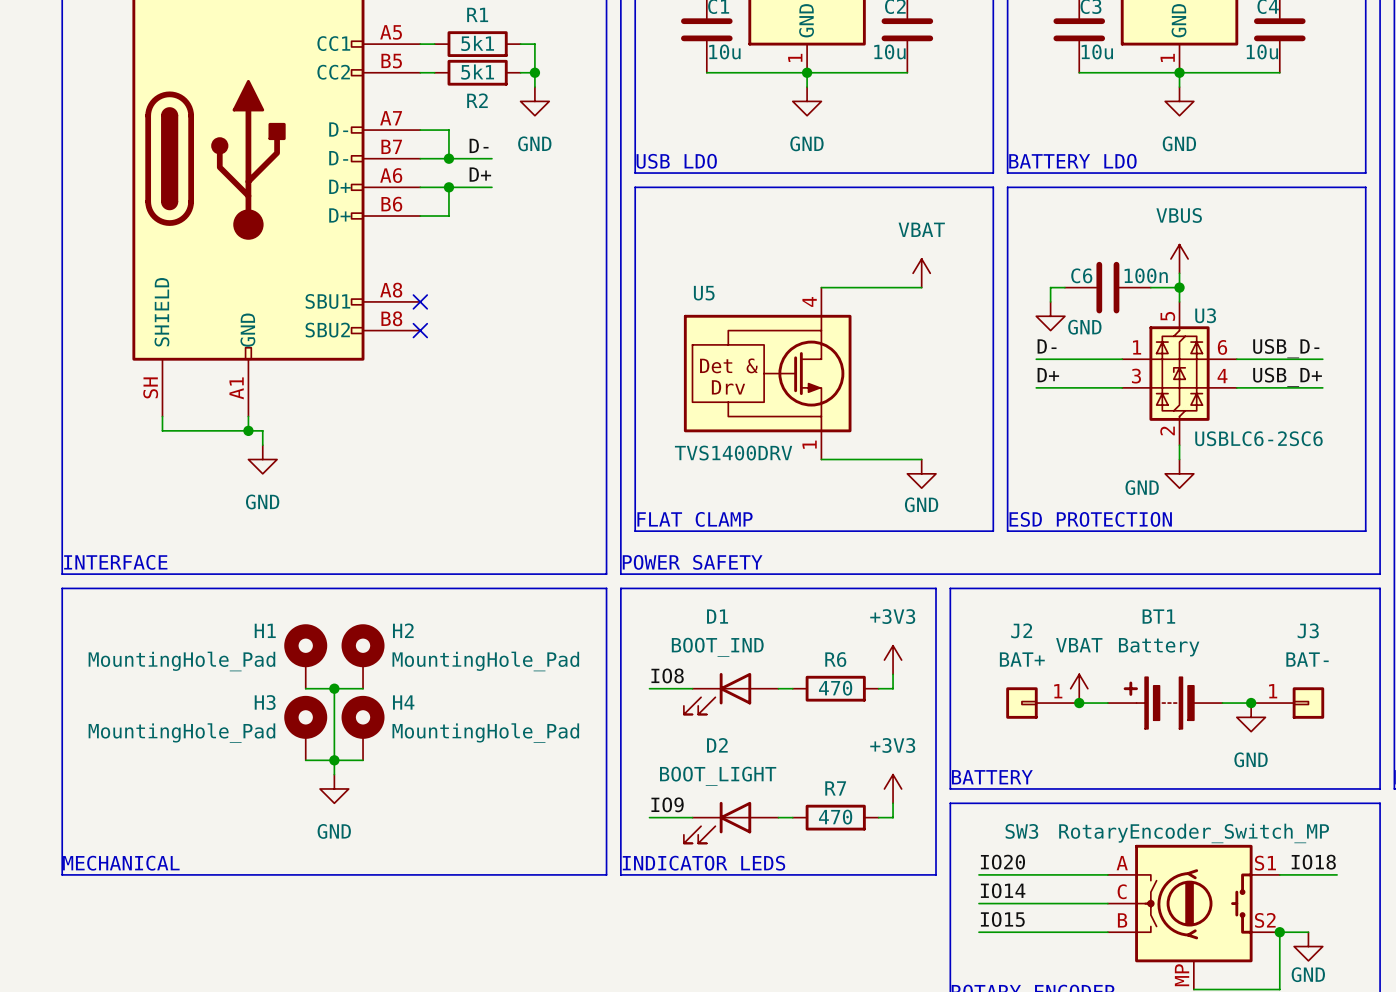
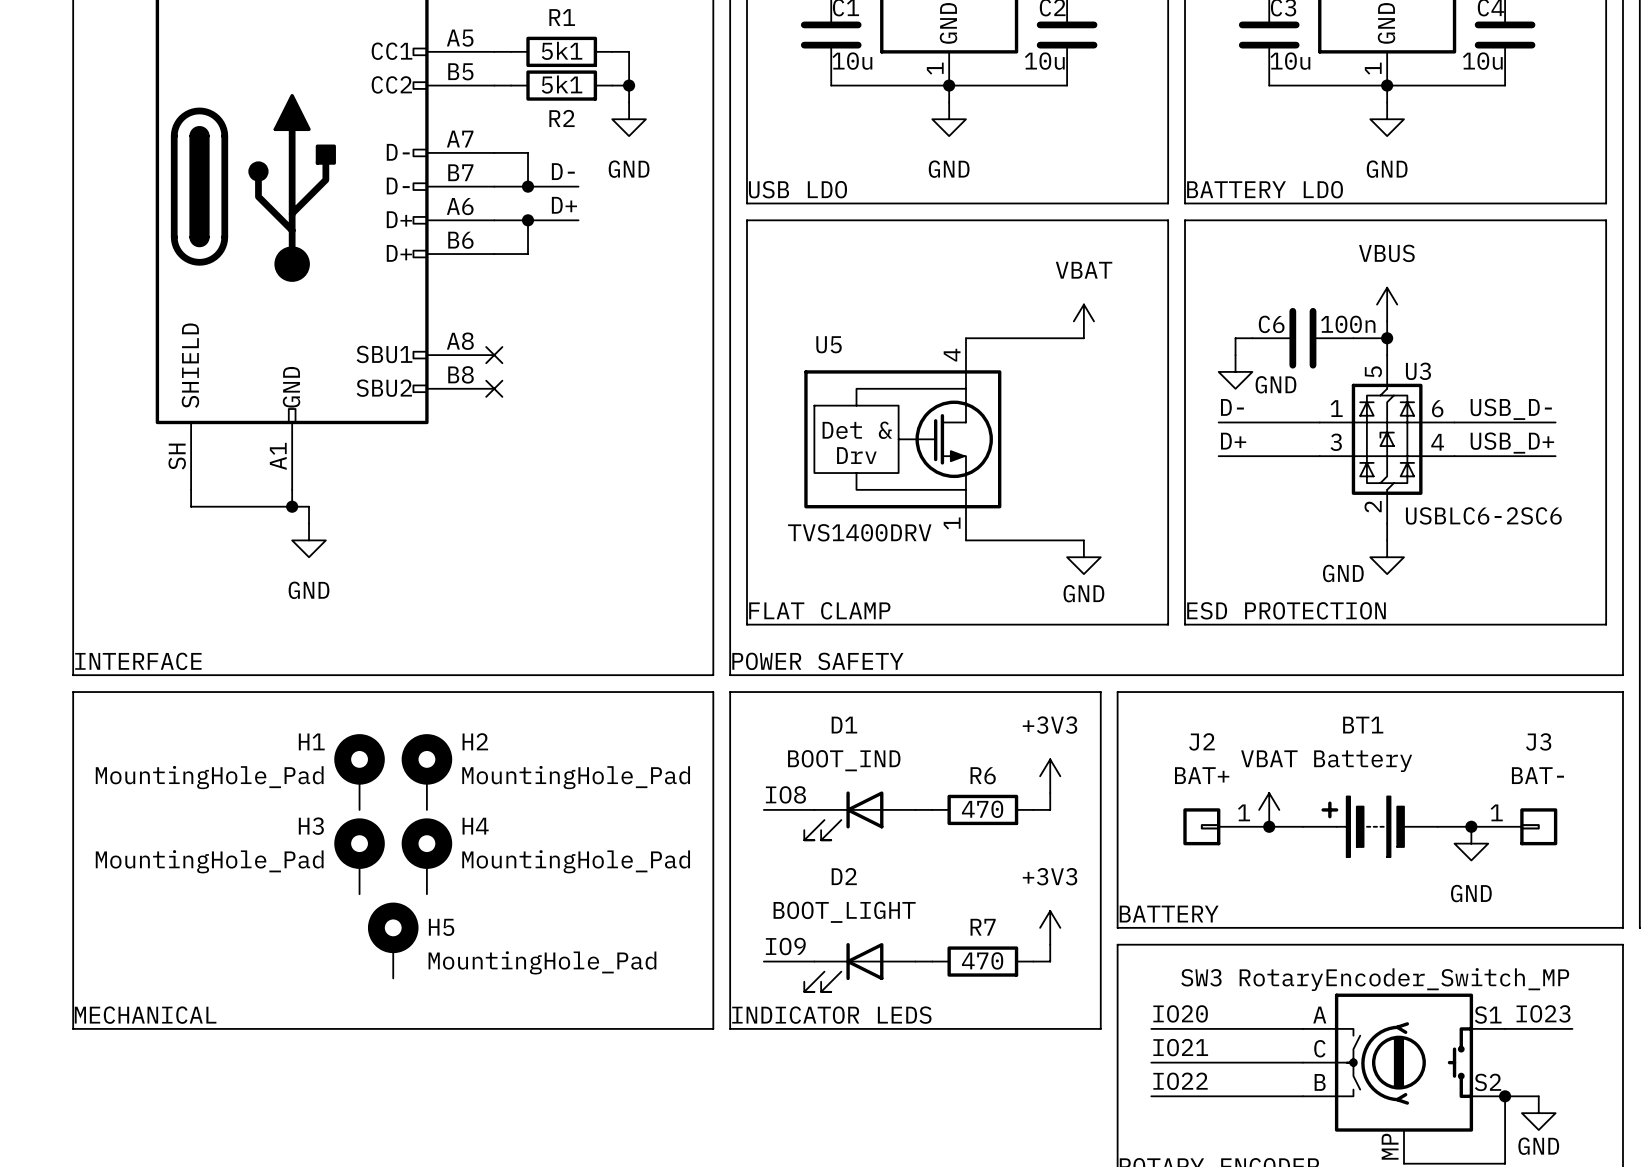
wire: (305, 688) (363, 688) -> none
wire: (334, 688) (334, 774) -> none
junction: (334, 688) -> none
wire: (305, 760) (363, 760) -> none
junction: (334, 760) -> none
power symbol: GND (334, 788) -> none
H5: none -> MountingHole_Pad (393, 940)
label: IO18 (1313, 862) -> IO23 (1543, 1013)
label: IO14 (1003, 890) -> IO21 (1180, 1047)
label: IO15 (1002, 919) -> IO22 (1180, 1081)

